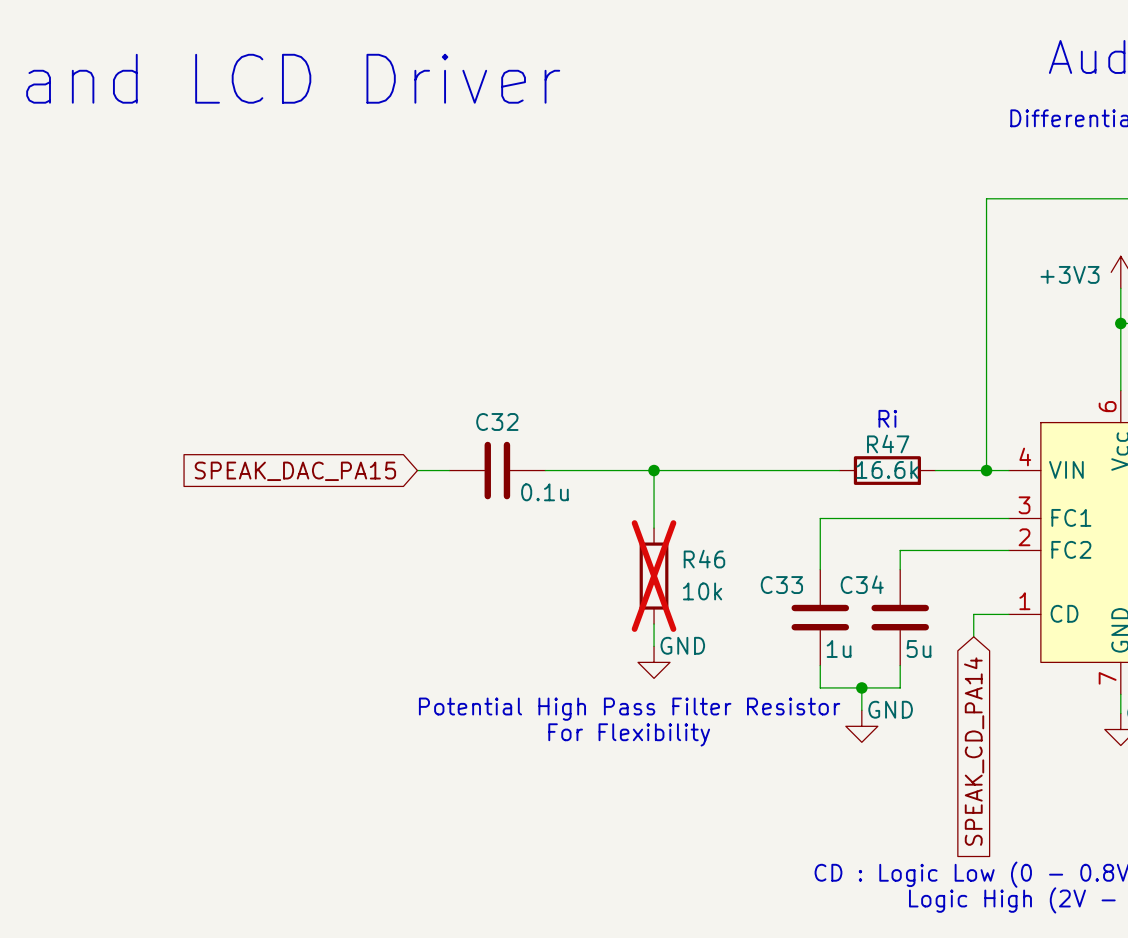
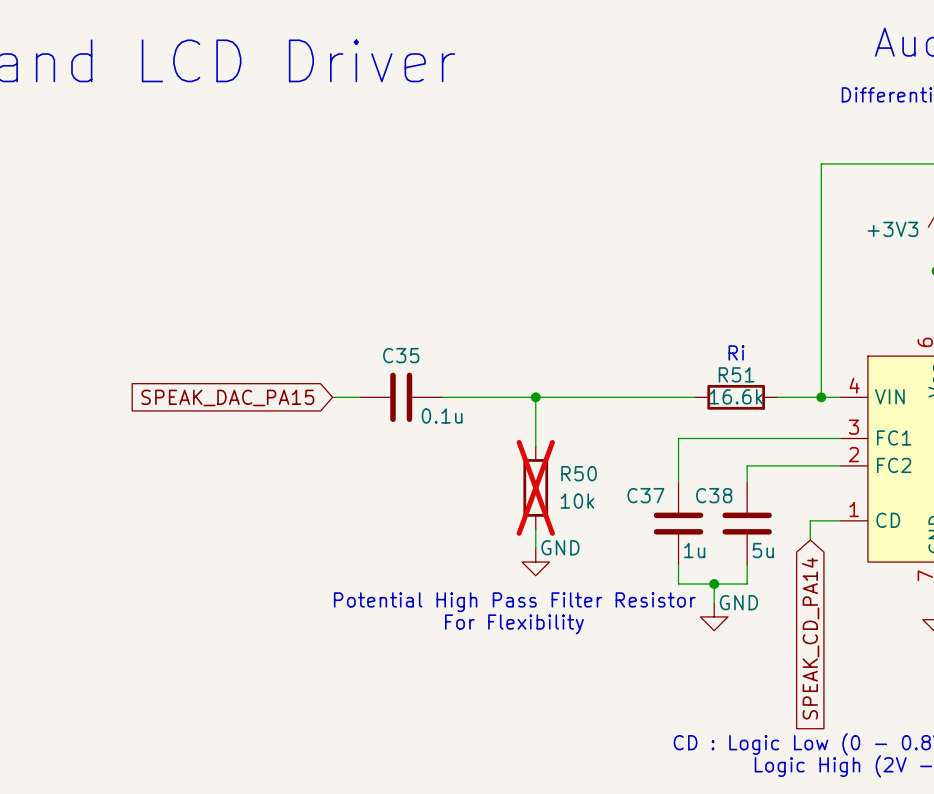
C32 name: C32 (497, 421) -> C35 (401, 355)
R47 name: R47 (888, 443) -> R51 (736, 374)
R46 name: R46 (704, 559) -> R50 (579, 473)
C34 name: C34 (862, 584) -> C38 (714, 495)
C33 name: C33 (781, 585) -> C37 (645, 495)

